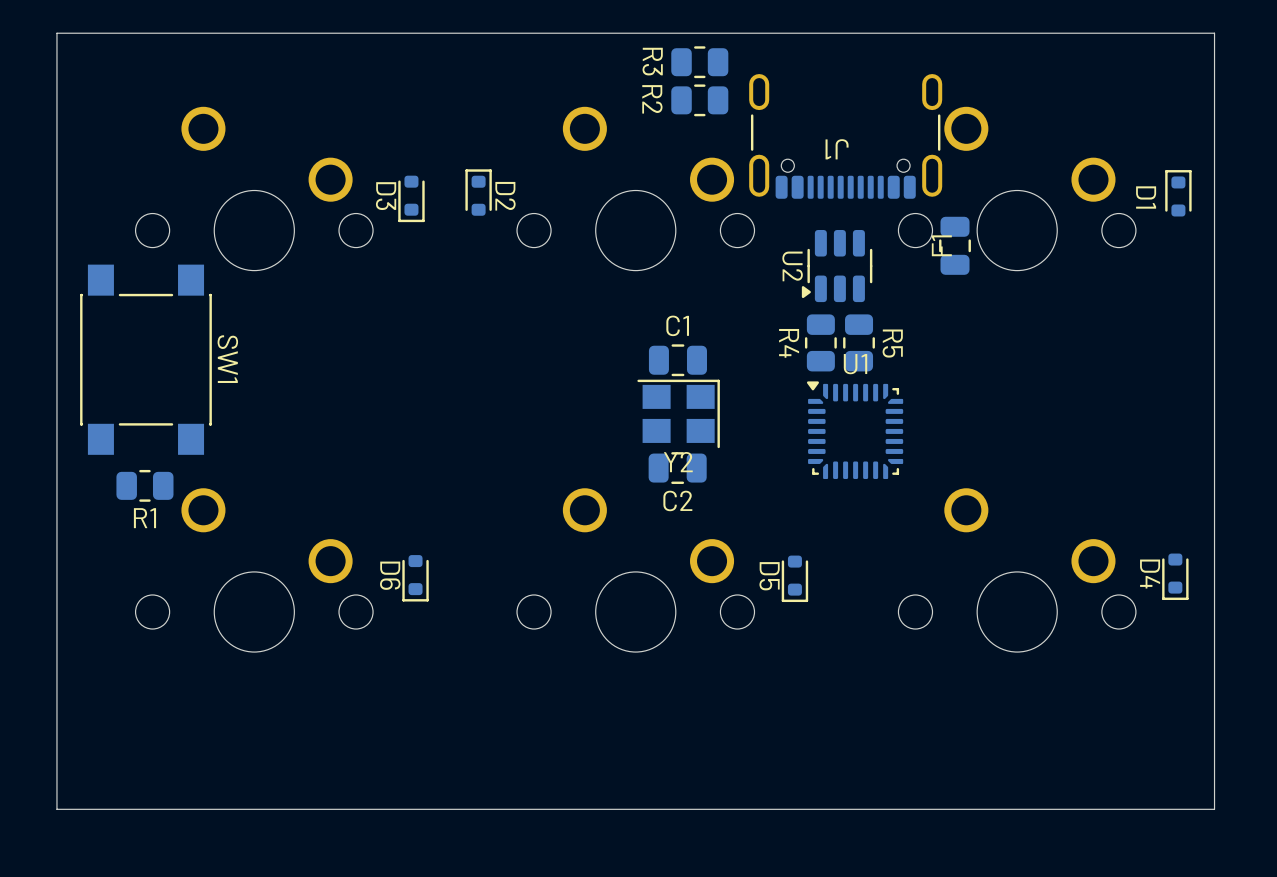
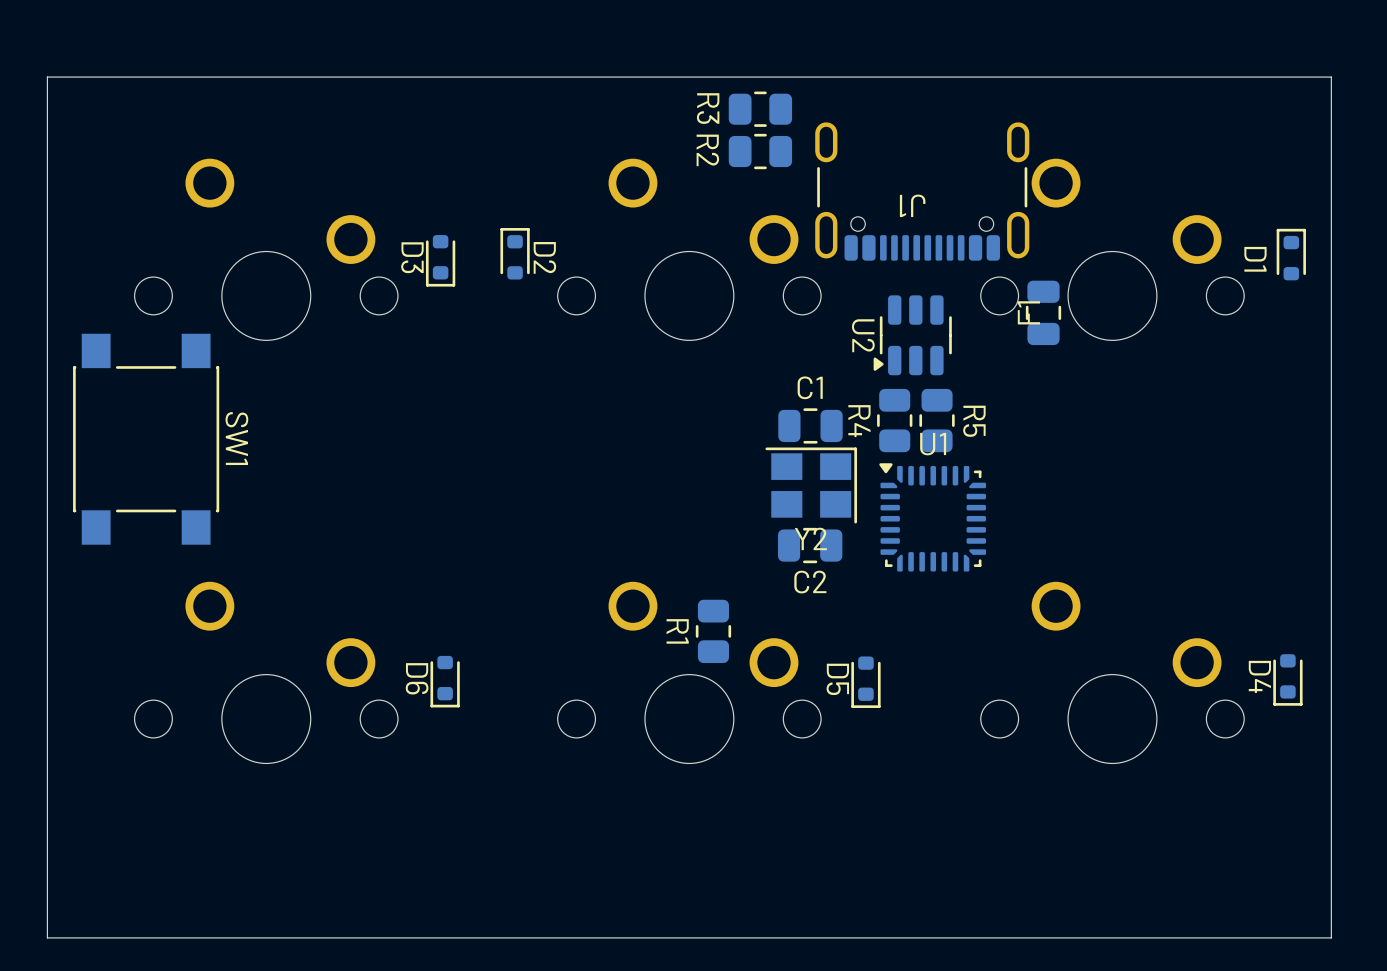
C1 position: (677, 360) -> (810, 425)
Y2 position: (678, 413) -> (811, 485)
C2 position: (677, 468) -> (810, 545)
R1 rotation: 0° (144, 485) -> 90° clockwise (713, 631)
R1 position: (144, 485) -> (713, 631)

